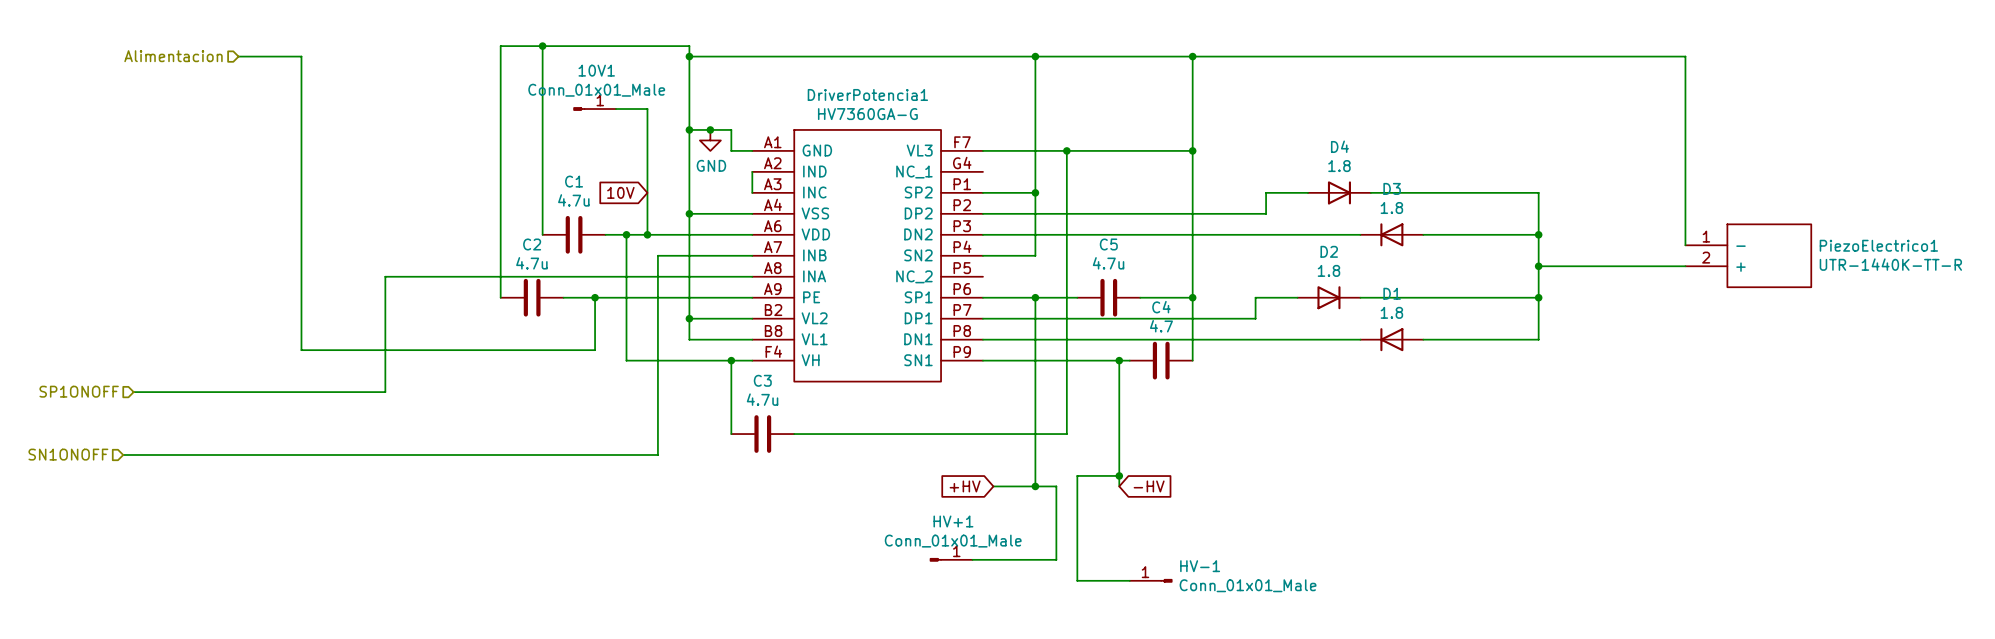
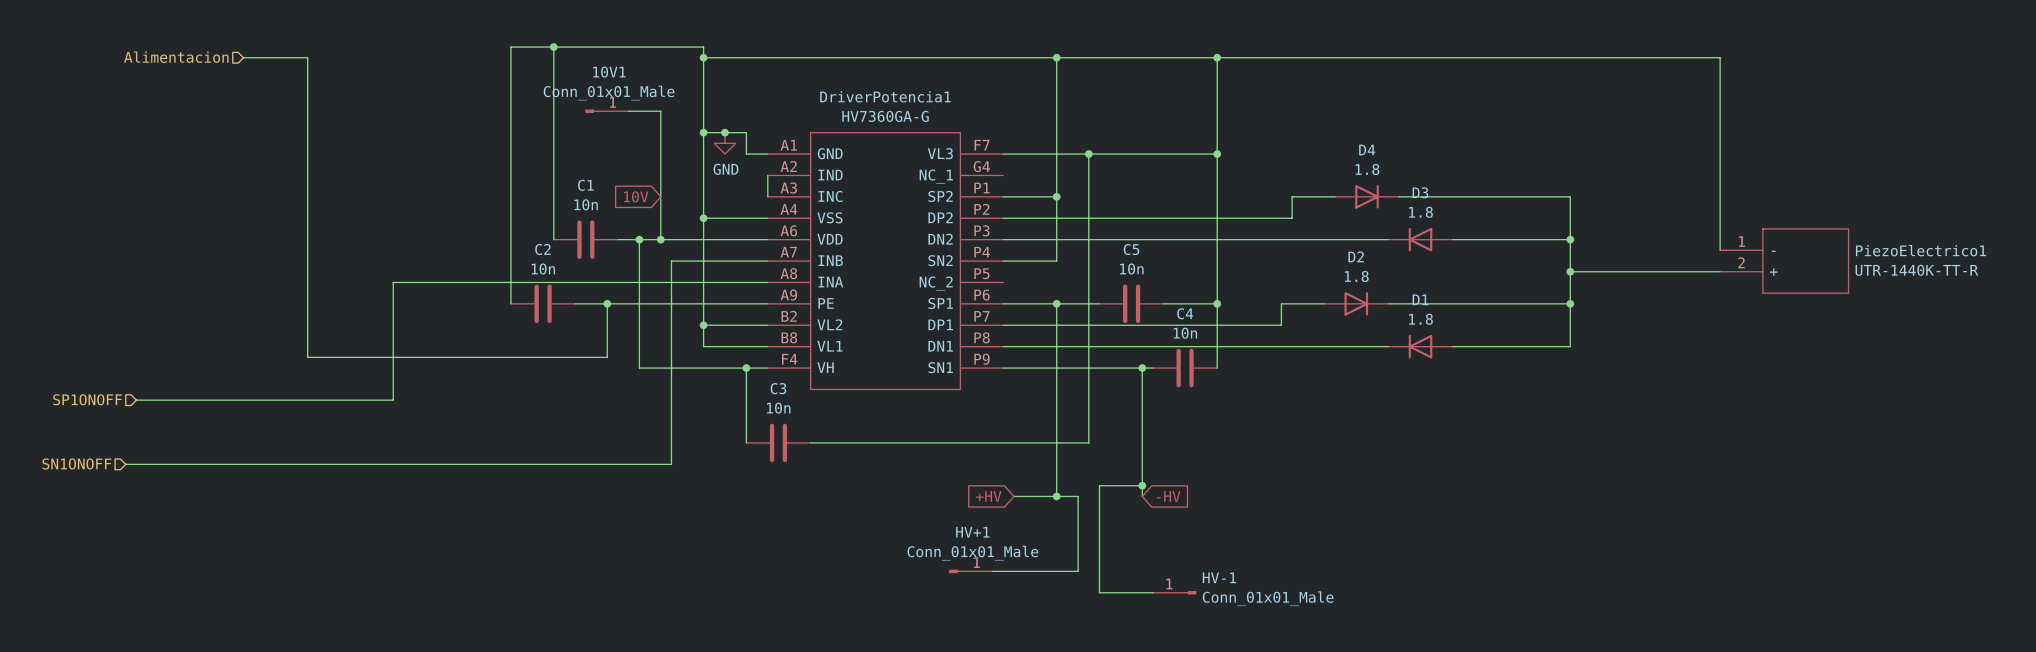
C1 value: 4.7u (573, 200) -> 10n (586, 204)
C2 value: 4.7u (531, 263) -> 10n (543, 269)
C5 value: 4.7u (1108, 263) -> 10n (1131, 269)
C4 value: 4.7 (1161, 326) -> 10n (1185, 333)
C3 value: 4.7u (762, 399) -> 10n (778, 408)

